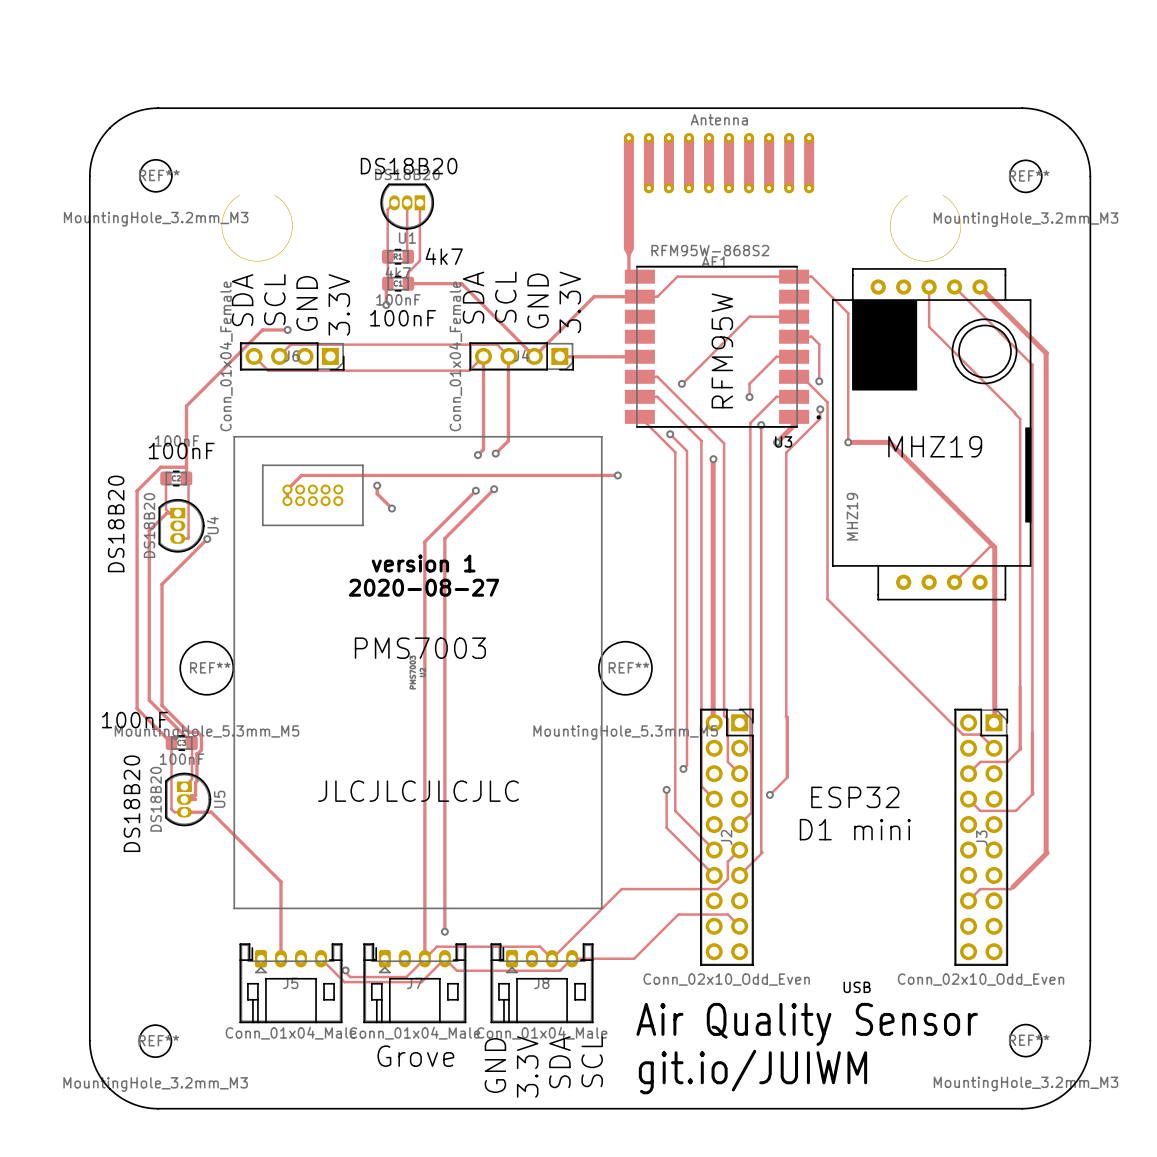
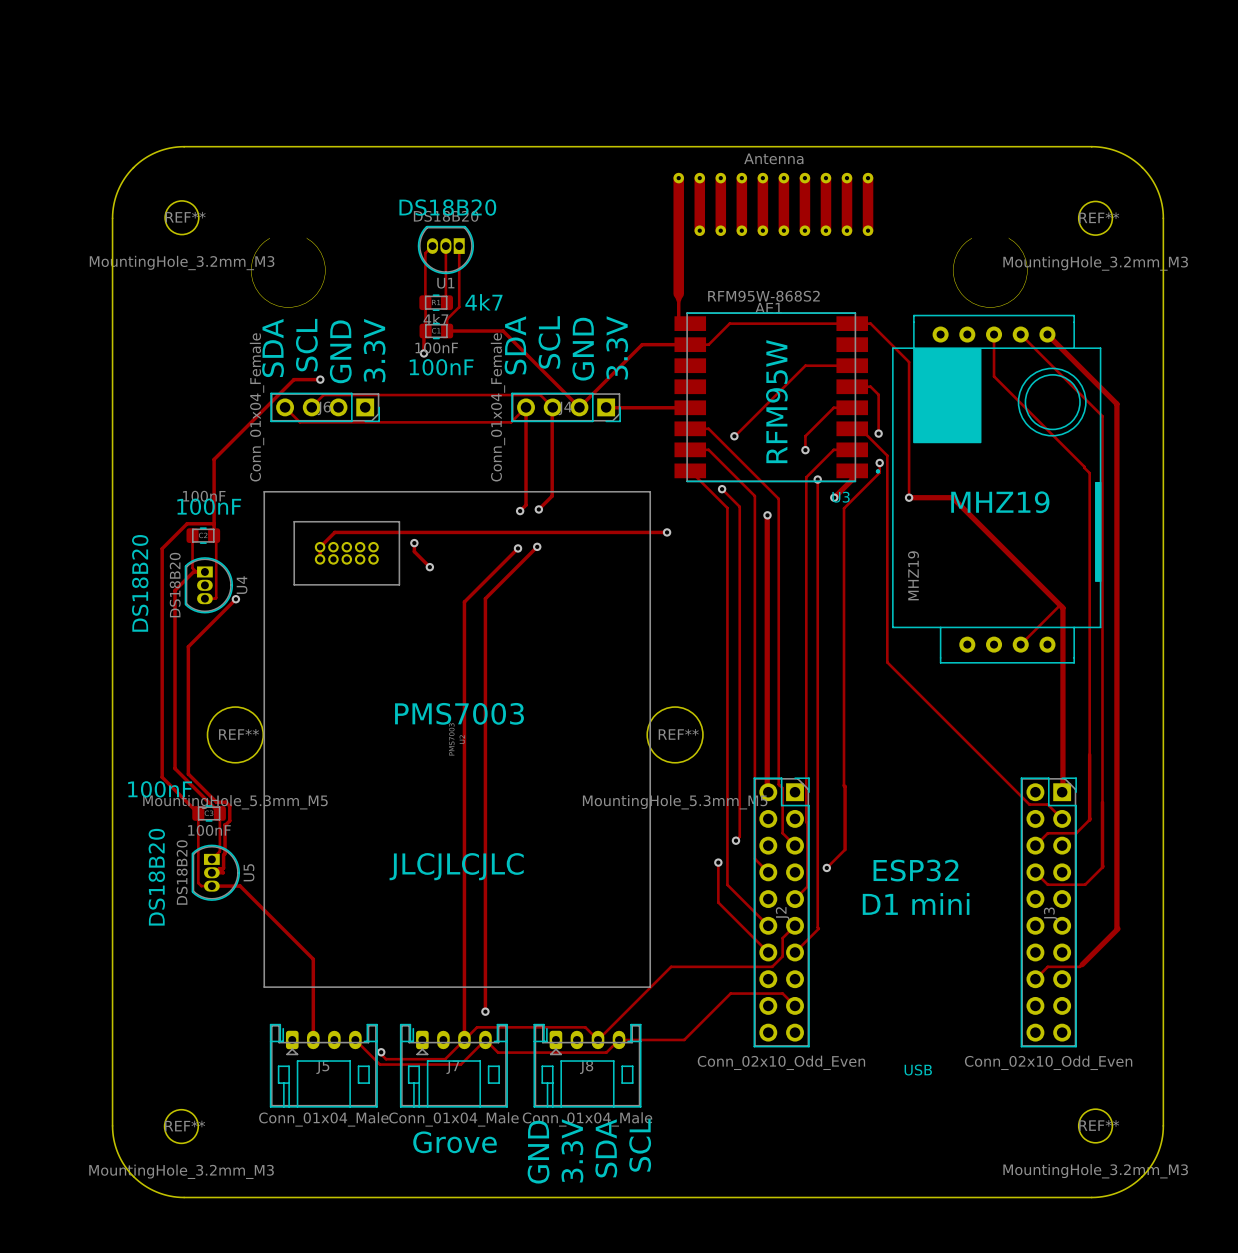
text: version 1 (423, 563) -> none
text: 2020-08-27 (423, 587) -> none
text: JLCJLCJLCJLC (418, 791) -> JLCJLCJLC (456, 866)
text: Air Quality Sensor (807, 1024) -> none
text: git.io/JUIWM (752, 1072) -> none

